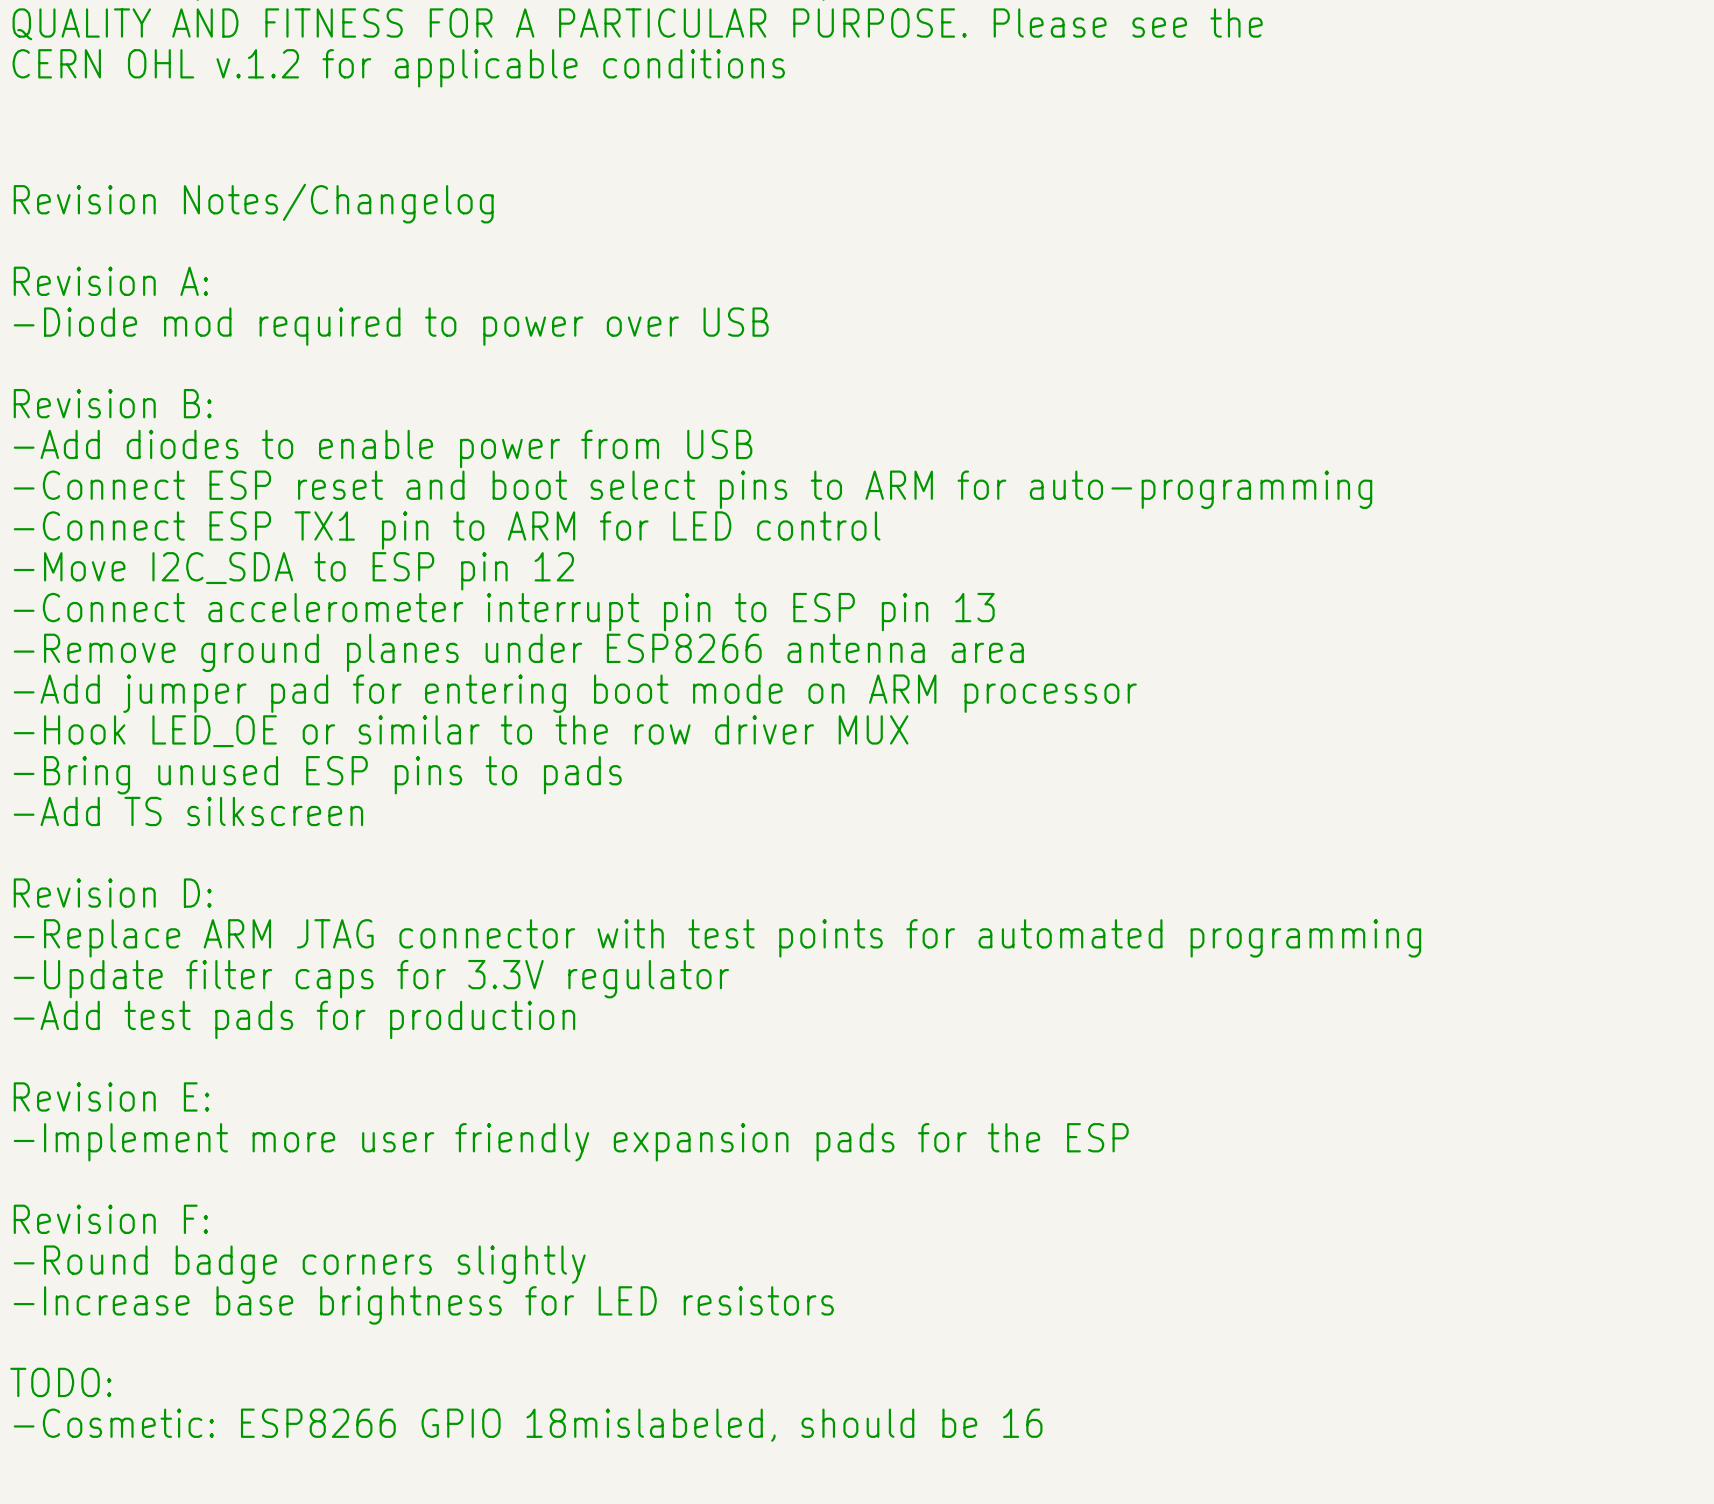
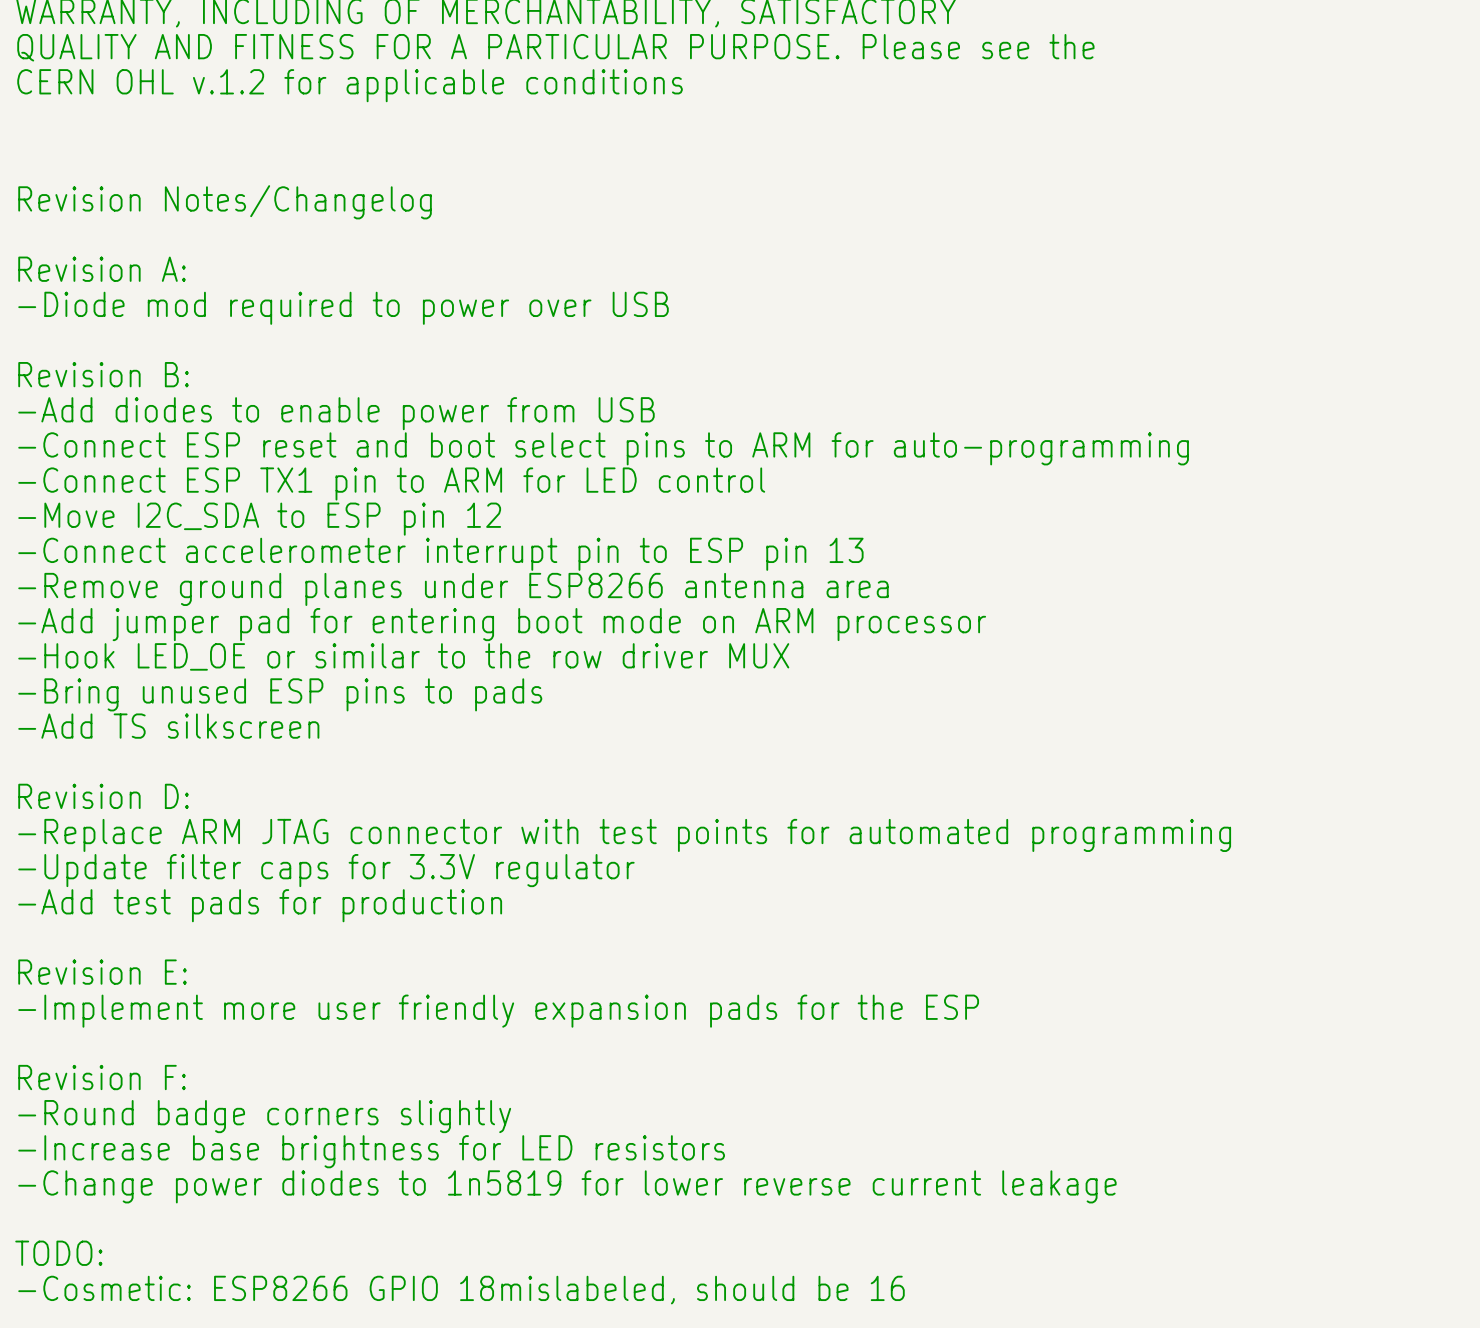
text: none -> -Change power diodes to 1n5819 for lower reverse current leakage (567, 1186)
text: TODO: (60, 1382) -> none
text: -Cosmetic: ESP8266 GPIO 18mislabeled, should be 16 (528, 1425) -> TODO: (58, 1253)
text: none -> -Cosmetic: ESP8266 GPIO 18mislabeled, should be 16 (461, 1290)

